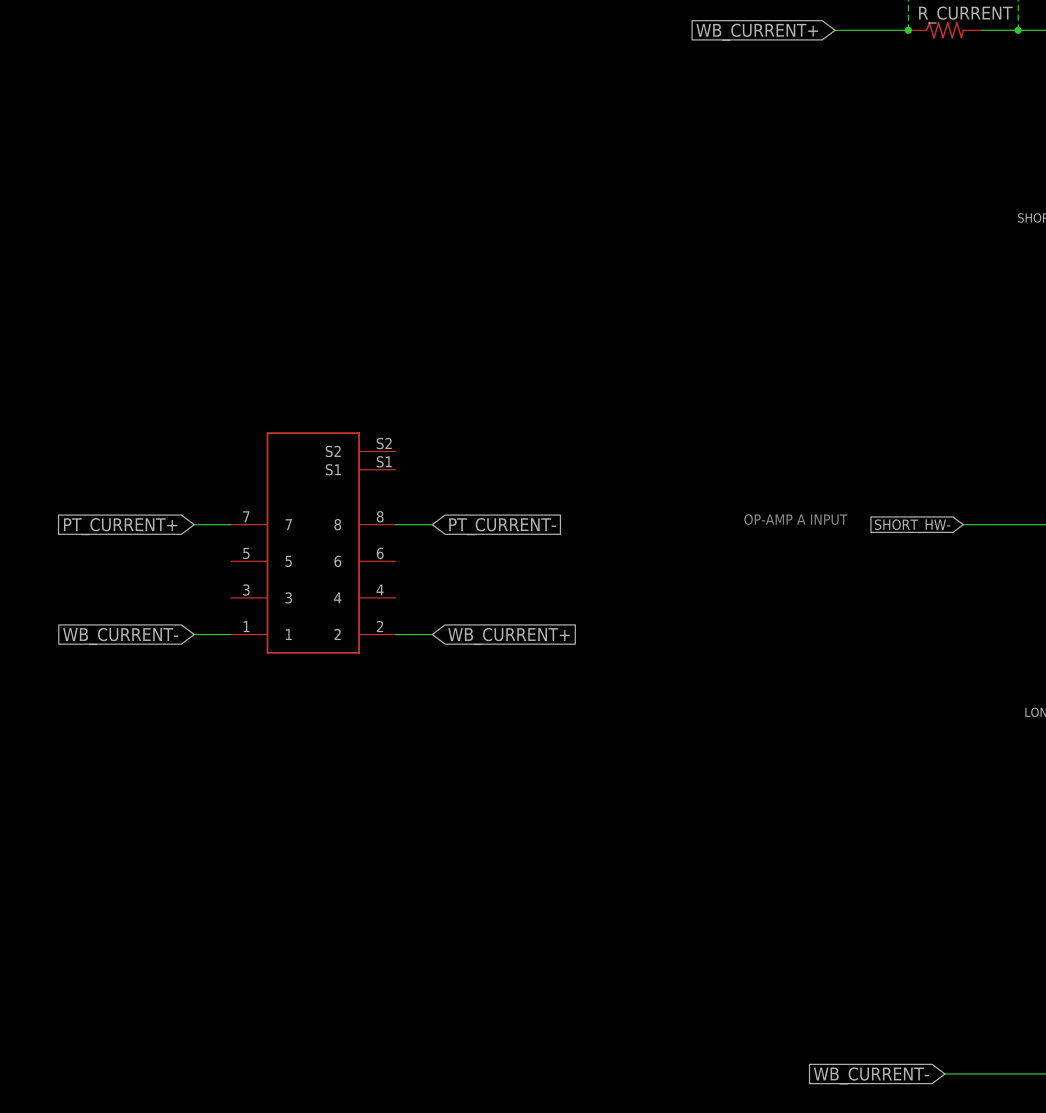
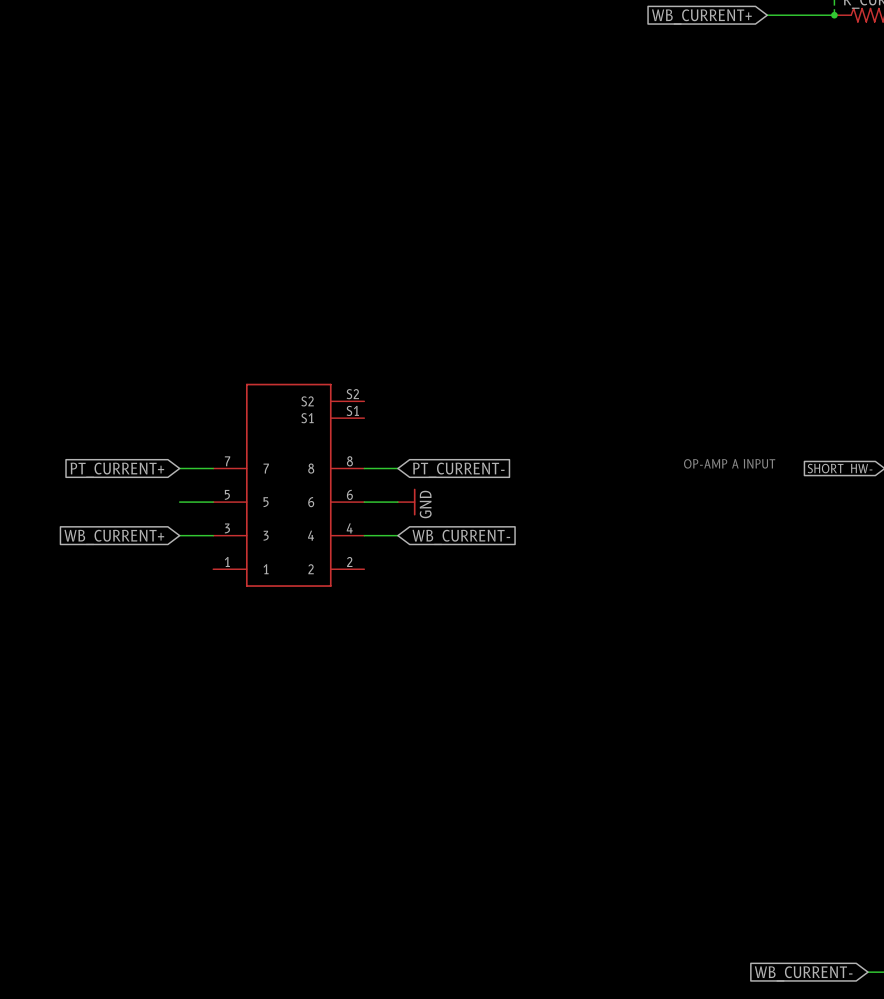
wire: none -> (179, 502) (213, 502)
wire: none -> (364, 502) (397, 502)
power symbol: none -> GND (406, 502)
global label: none -> WB_CURRENT+ (114, 537)
global label: none -> WB_CURRENT- (461, 537)
wire: (194, 634) (230, 634) -> (179, 535) (213, 535)
wire: (395, 634) (432, 634) -> (364, 535) (397, 535)
global label: WB_CURRENT- (120, 636) -> none
global label: WB_CURRENT+ (508, 636) -> none

